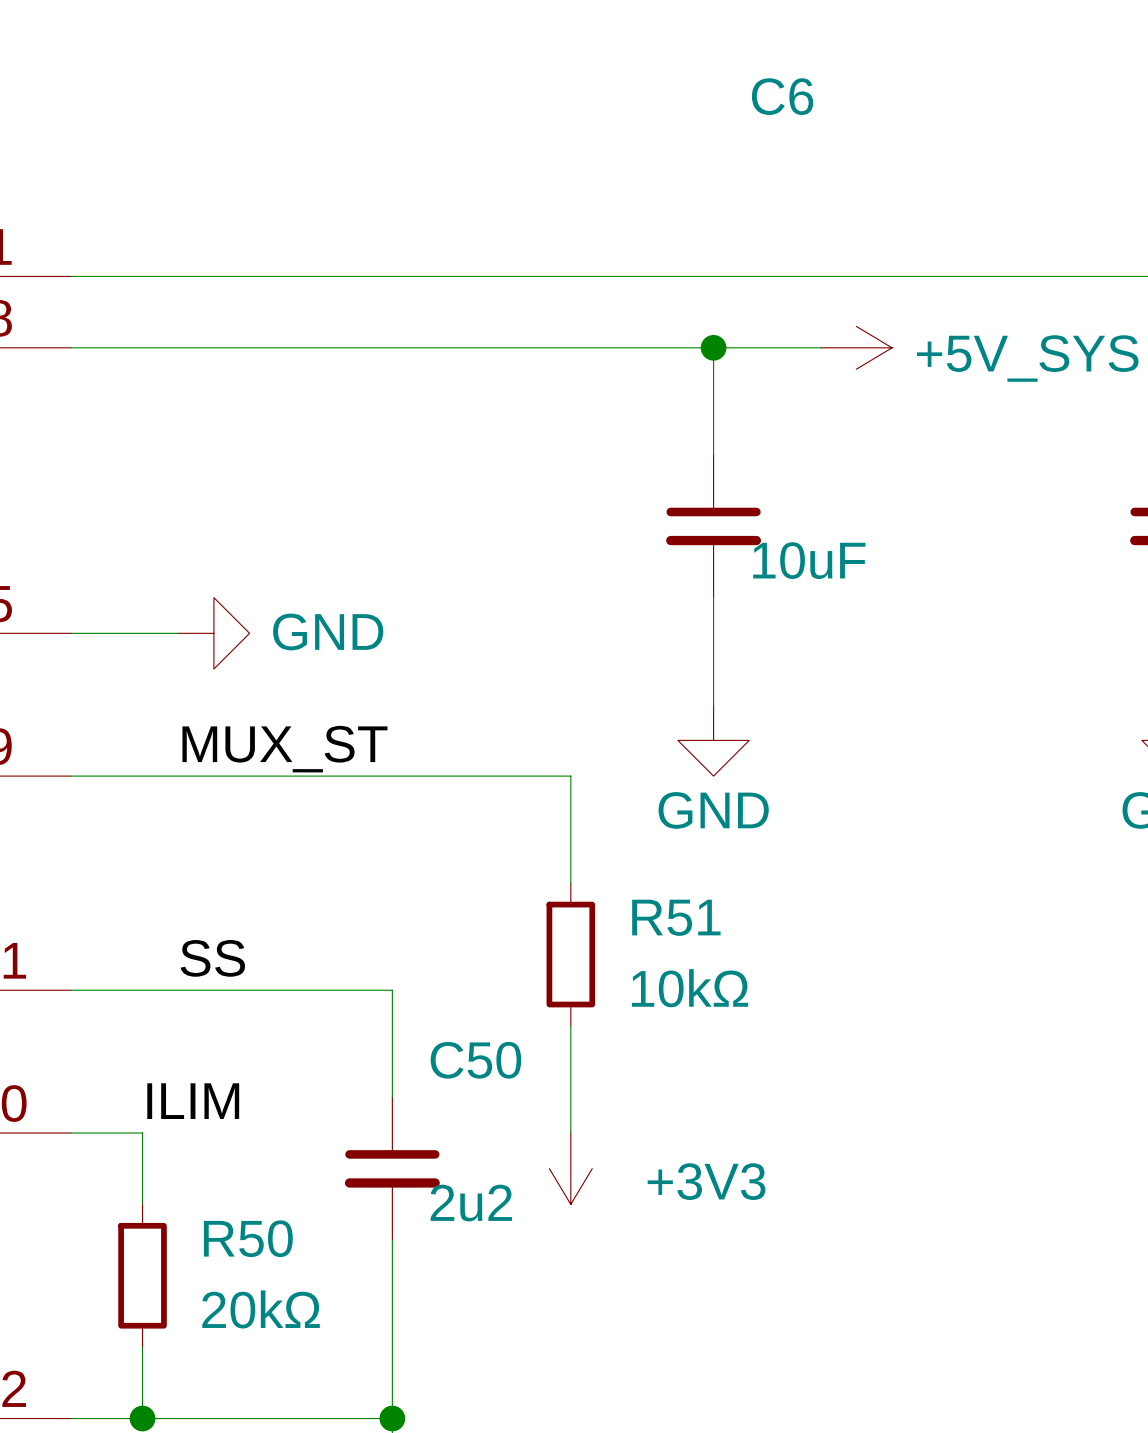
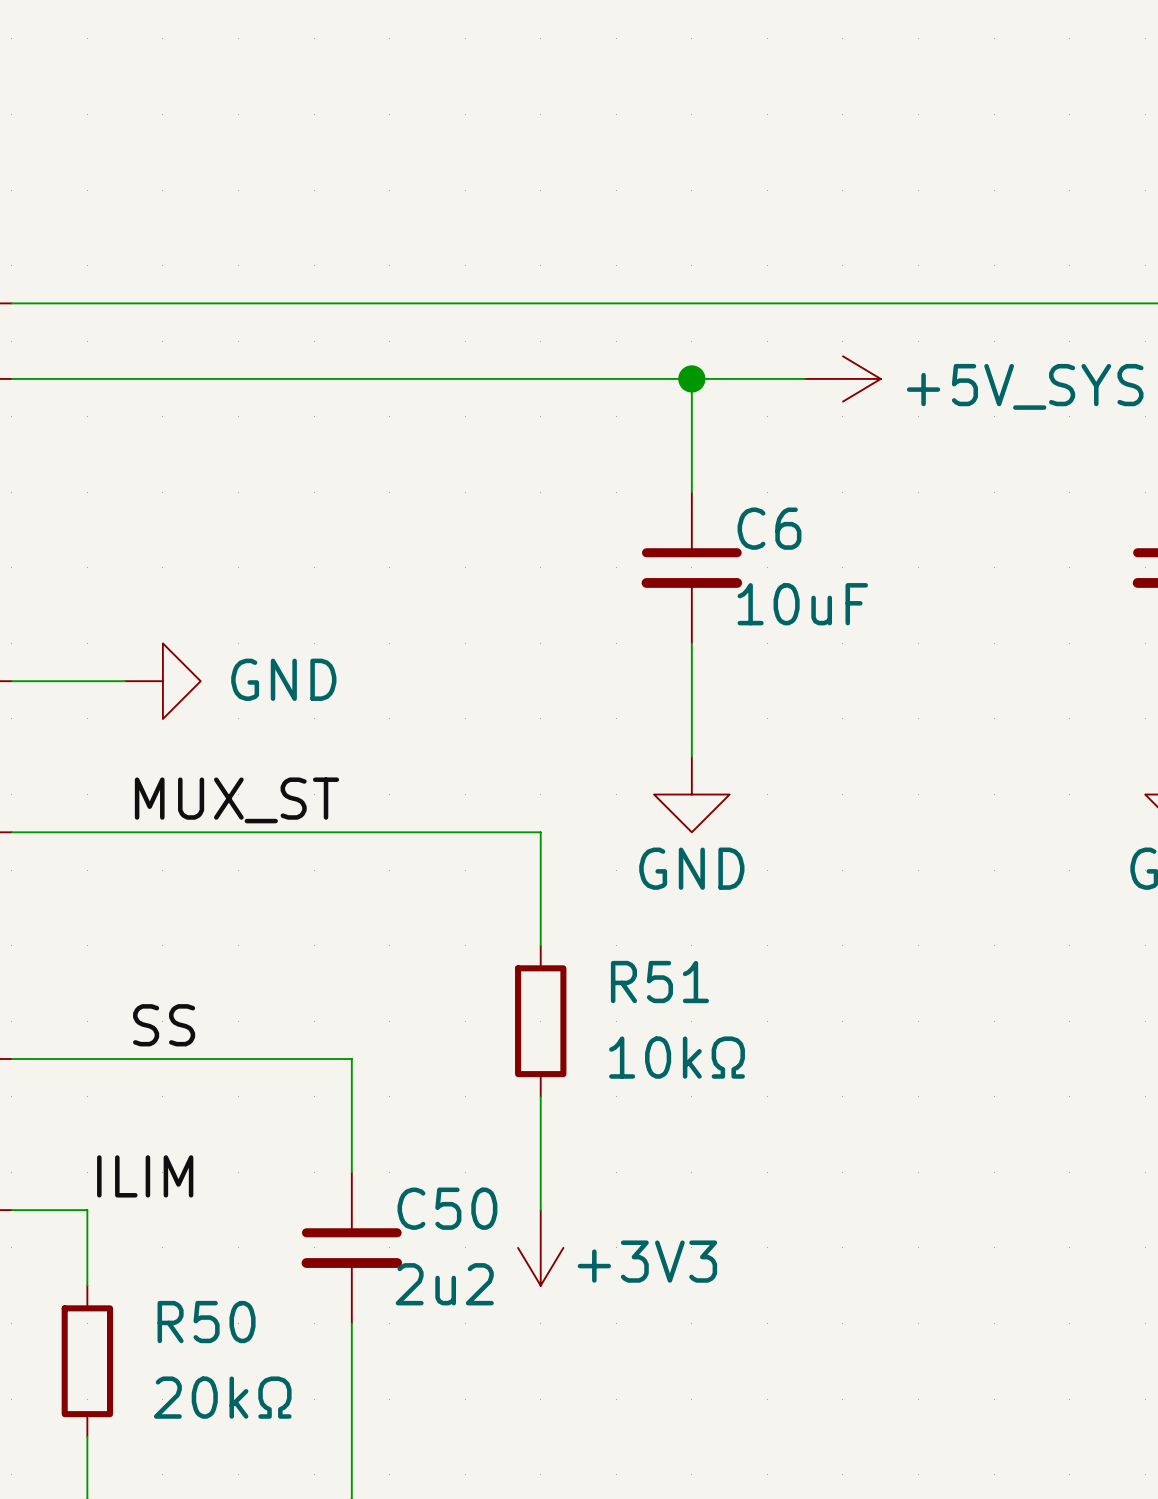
C6 name position: C6 (782, 96) -> C6 (769, 528)
C50 name position: C50 (475, 1060) -> C50 (447, 1208)
power symbol text position: +3V3 (706, 1181) -> +3V3 (647, 1261)

